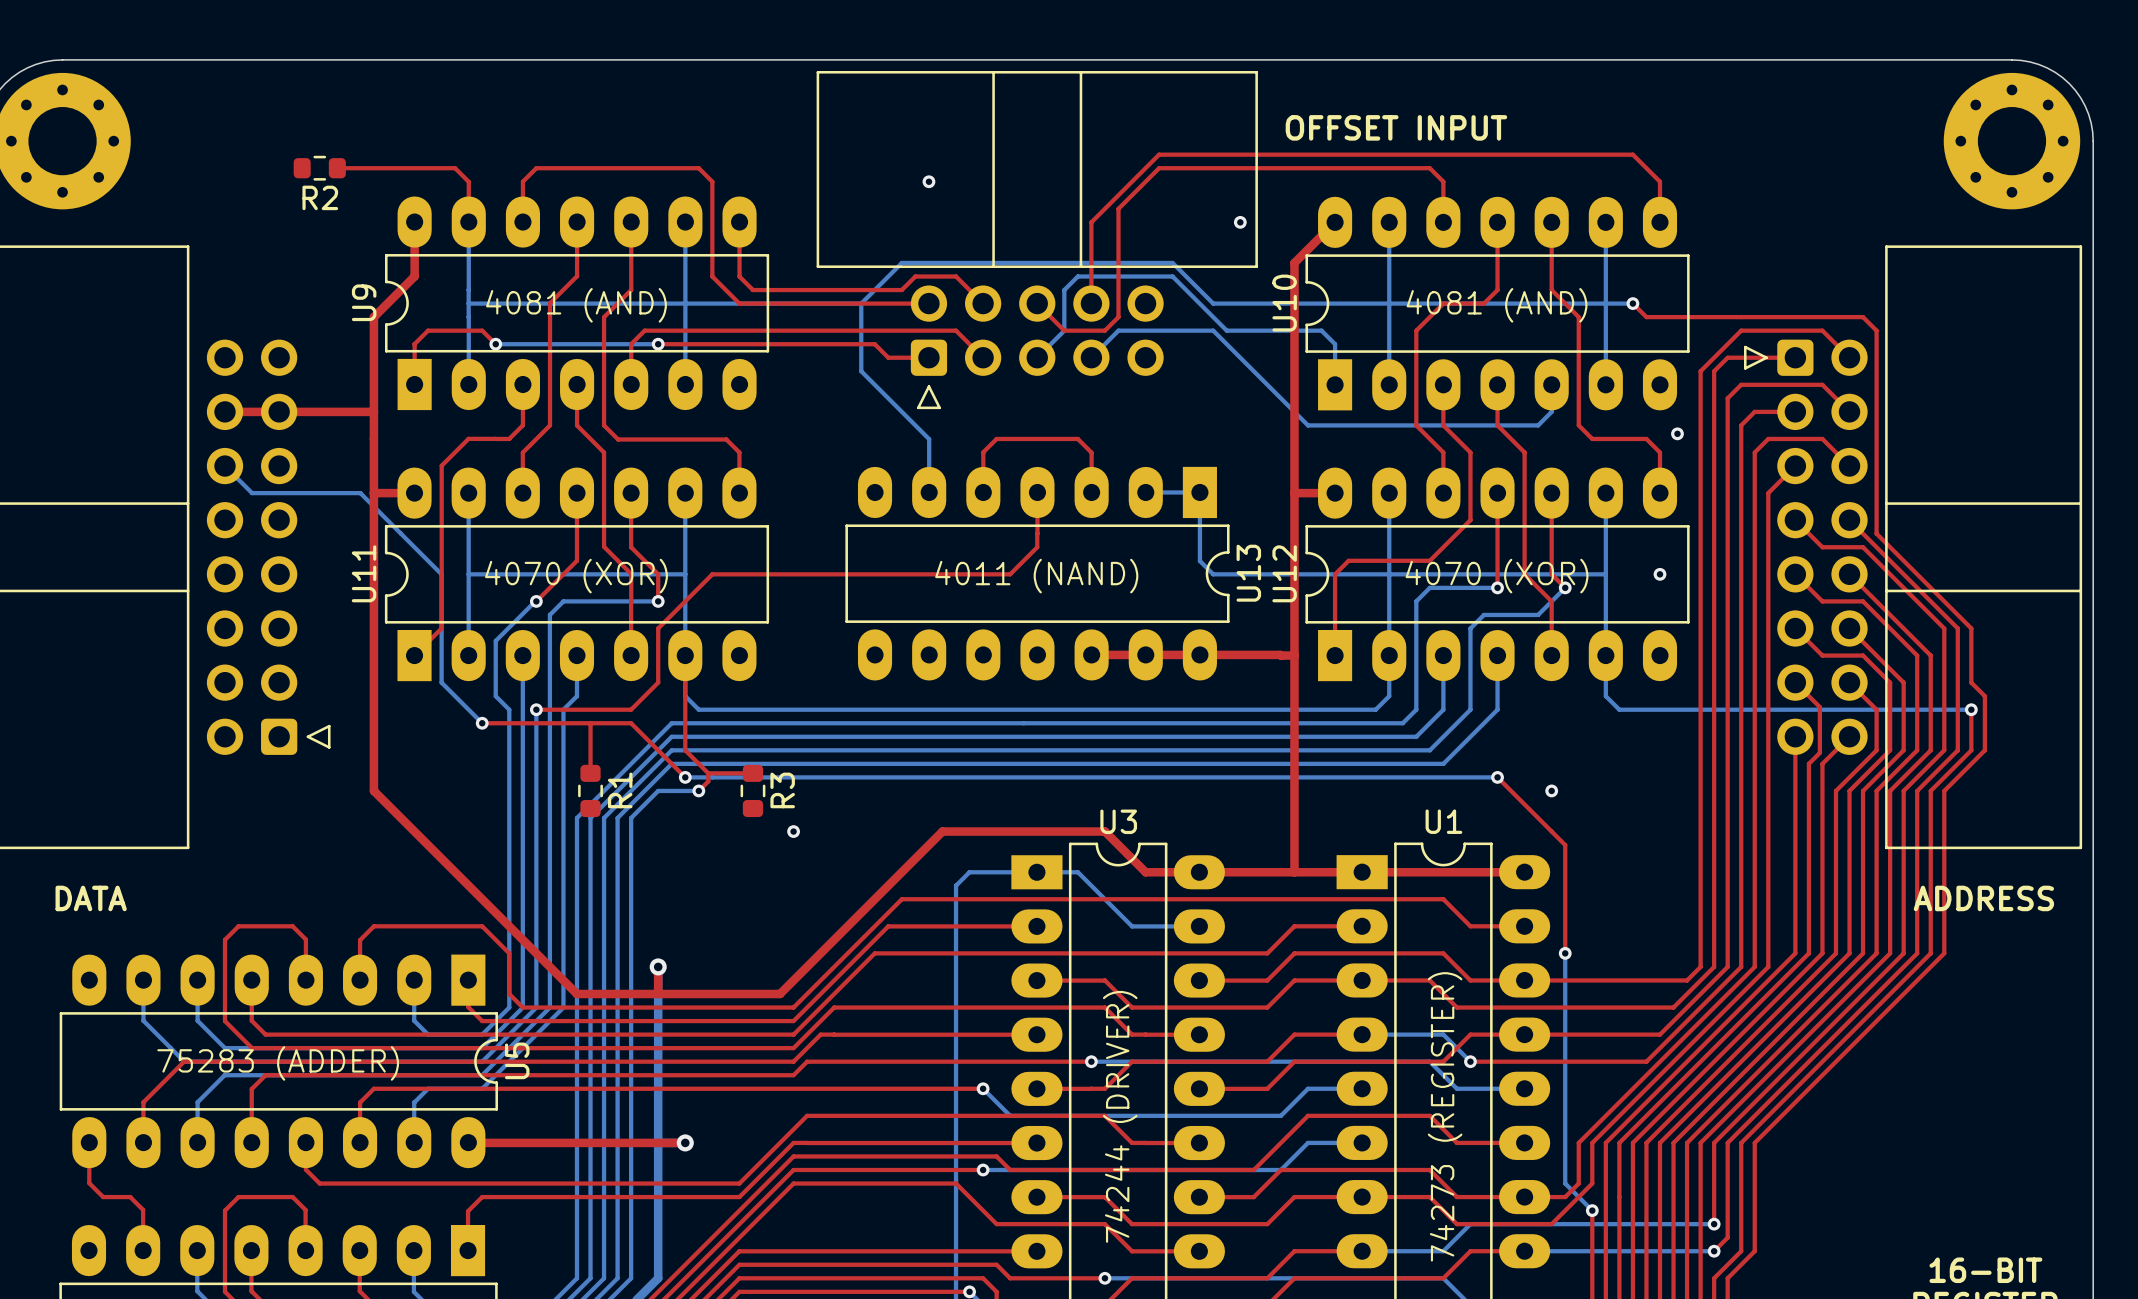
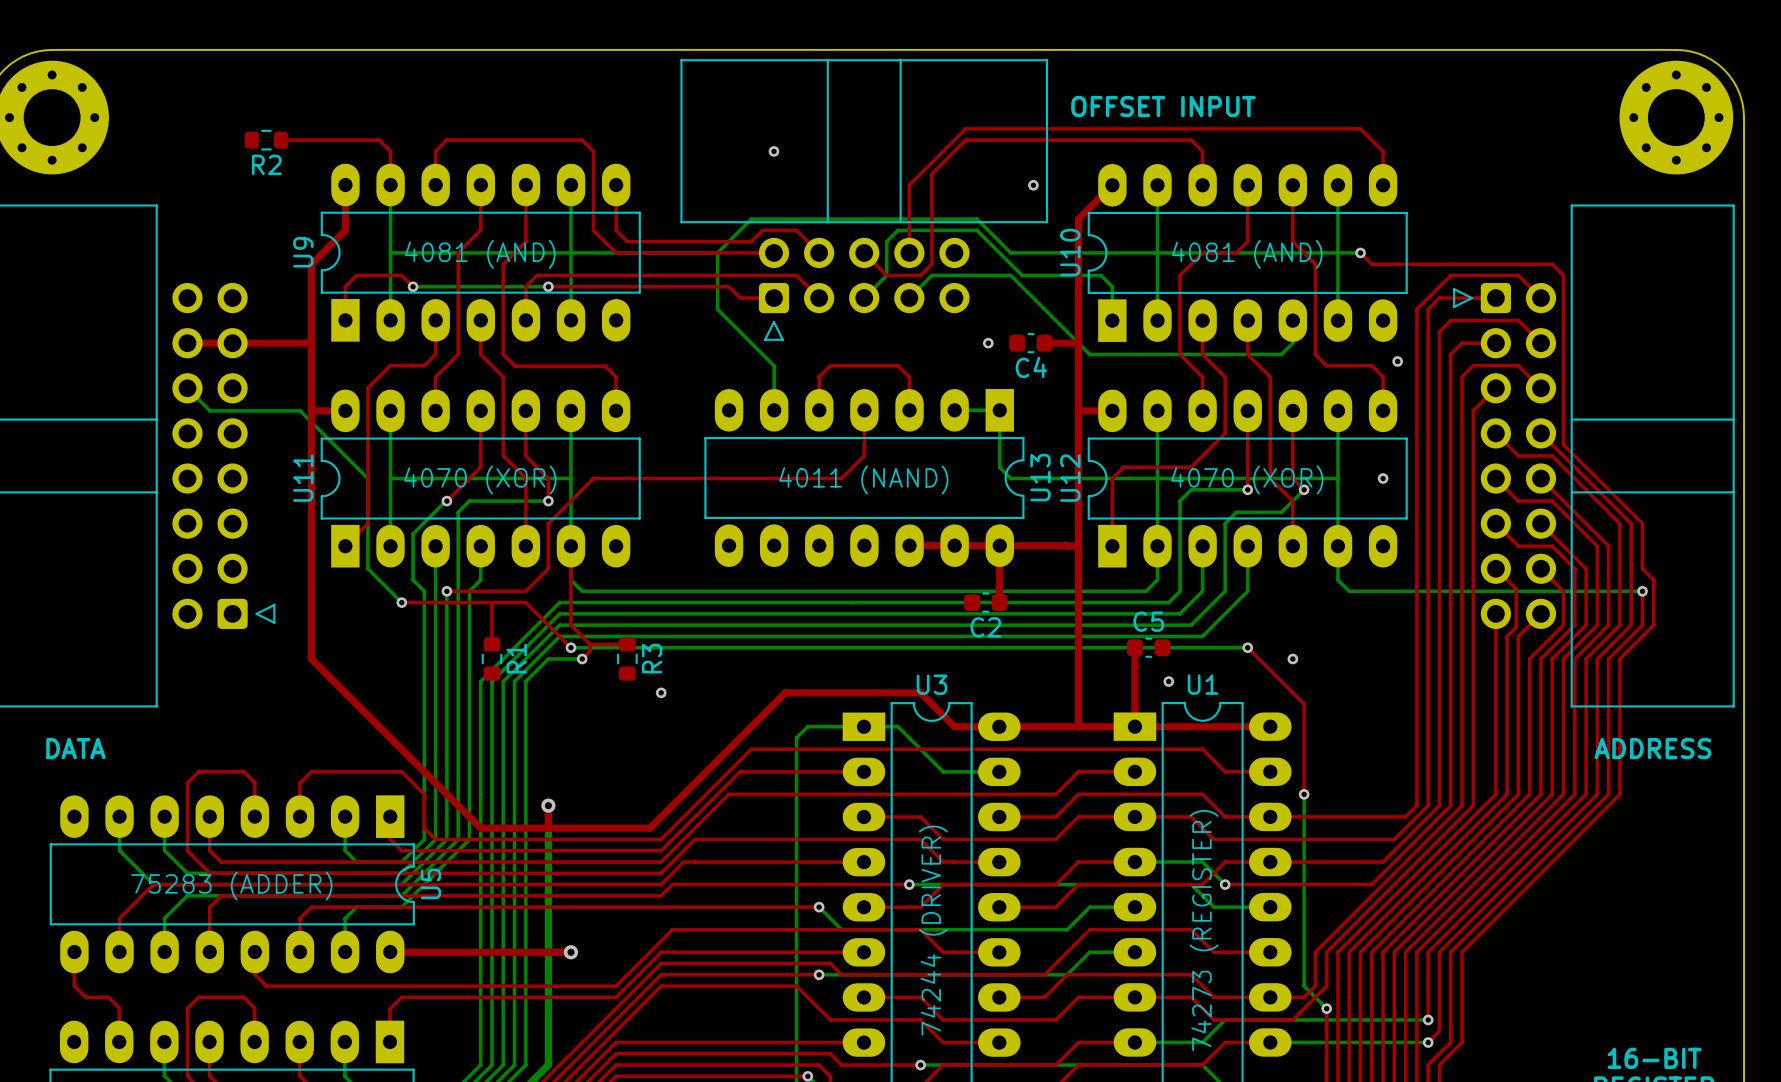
via: none -> (988, 343)
C4: none -> (1030, 343)
top track: none -> (1044, 343) (1078, 343)
top track: none -> (999, 545) (999, 602)
C2: none -> (985, 602)
top track: none -> (1134, 647) (1134, 726)
C5: none -> (1148, 647)
via: none -> (1168, 681)

